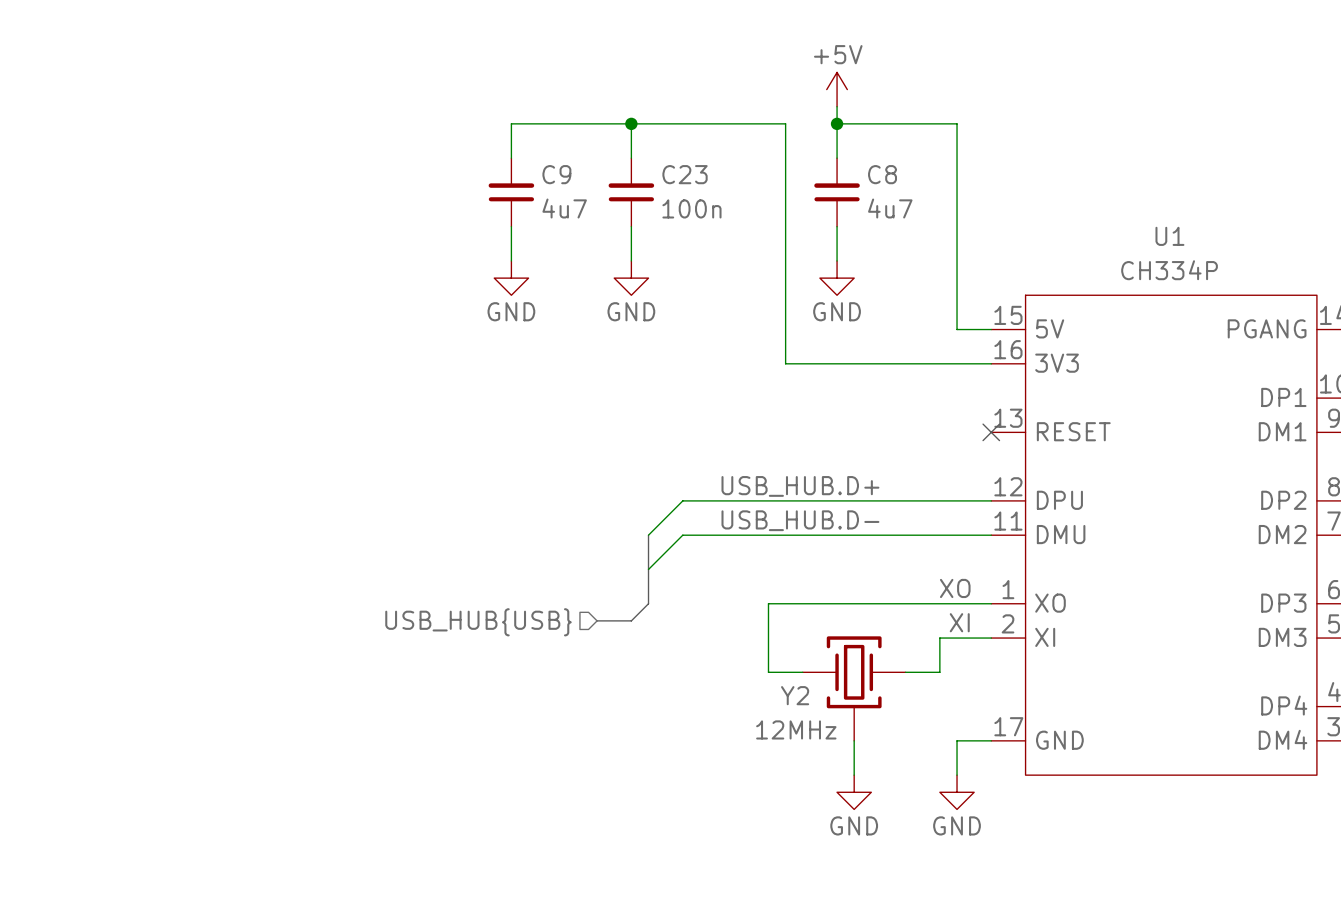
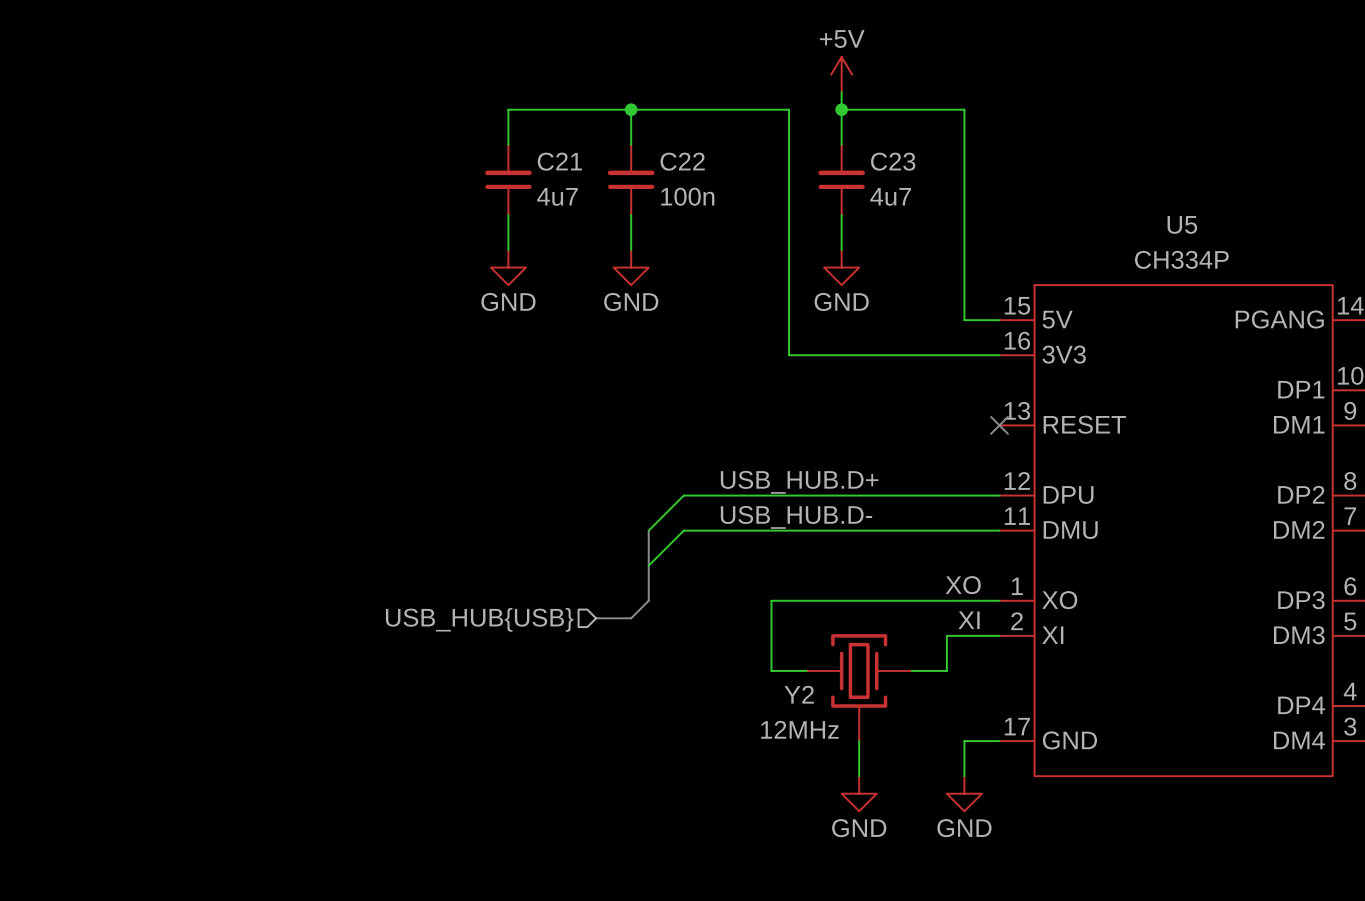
C9 name: C9 (556, 174) -> C21 (559, 161)
C23 name: C23 (685, 174) -> C22 (682, 161)
C8 name: C8 (882, 174) -> C23 (893, 161)
U1 name: U1 (1169, 236) -> U5 (1182, 224)

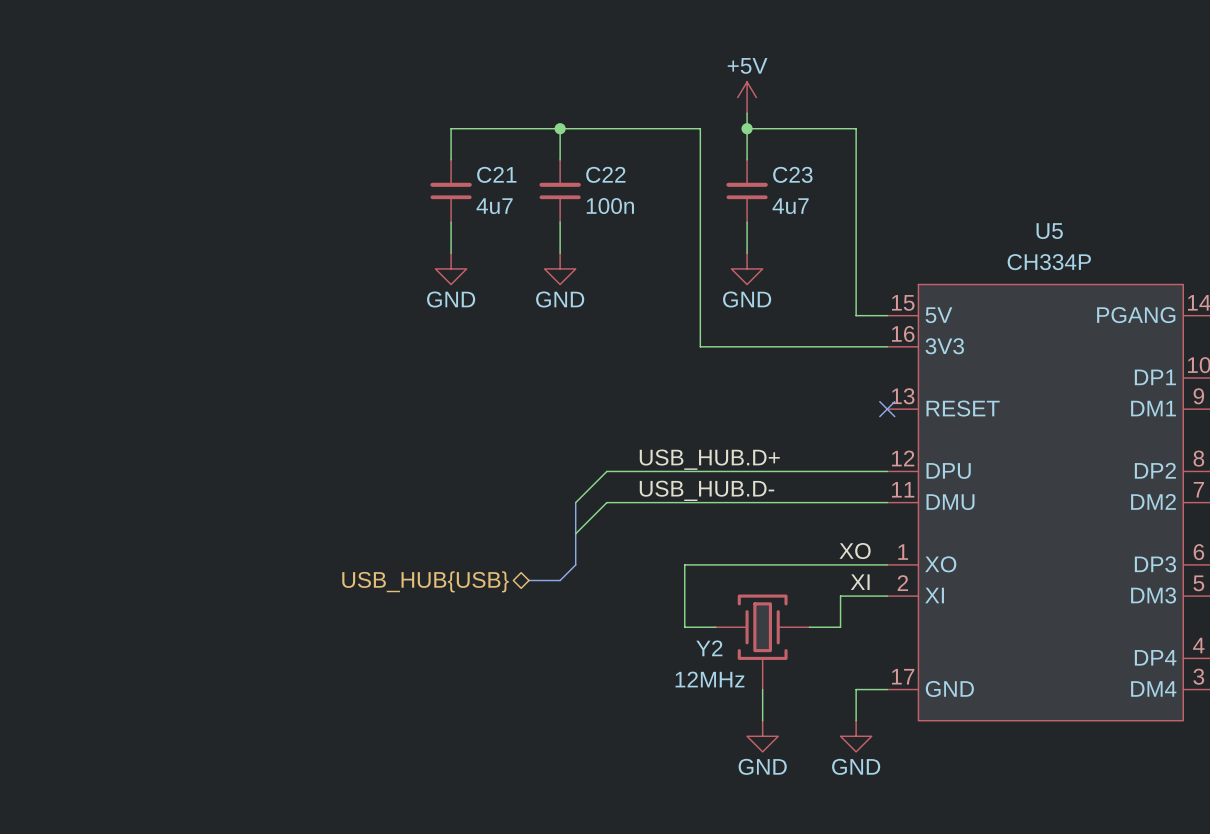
hierarchical label shape: input (479, 619) -> bidirectional (425, 581)

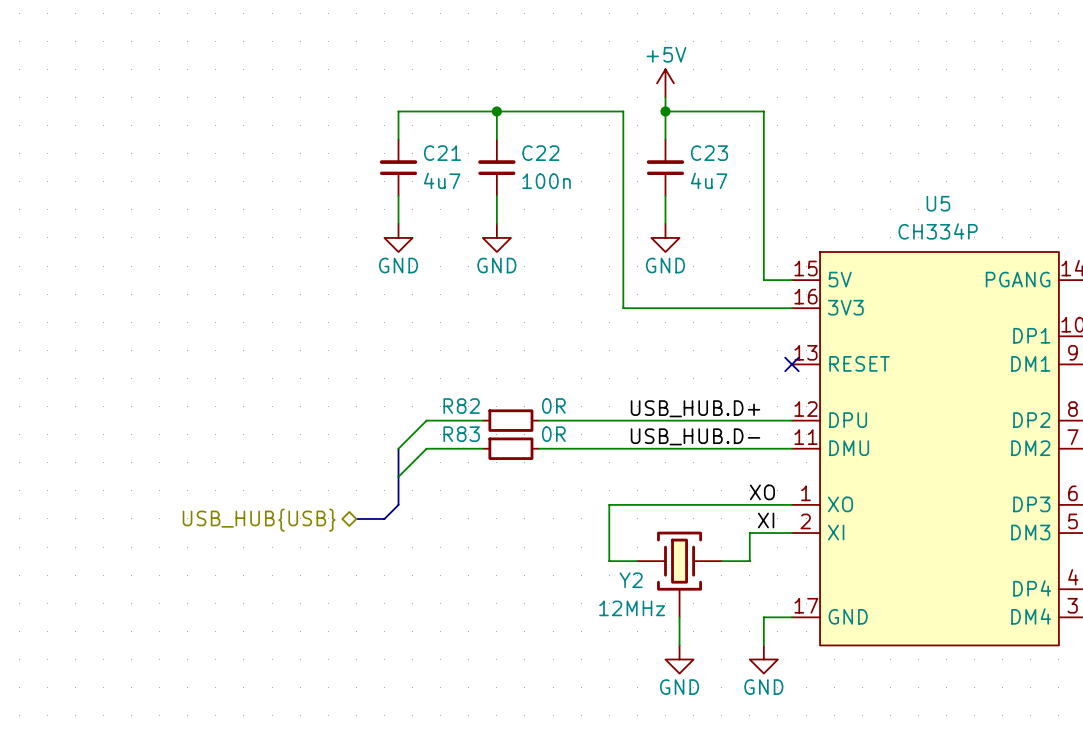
label position: USB_HUB.D+ (709, 459) -> USB_HUB.D+ (695, 408)
wire: none -> (482, 420) (426, 420) (398, 448)
R82: none -> (510, 420)
wire: (606, 471) (575, 502) -> none
label position: USB_HUB.D- (706, 490) -> USB_HUB.D- (695, 436)
wire: none -> (482, 448) (426, 448) (398, 476)
bus: (575, 502) (575, 564) (560, 580) (528, 580) -> (398, 448) (398, 504) (384, 518) (356, 518)
R83: none -> (510, 448)
wire: (606, 502) (575, 533) -> none
hierarchical label position: USB_HUB{USB} (425, 581) -> USB_HUB{USB} (259, 520)

